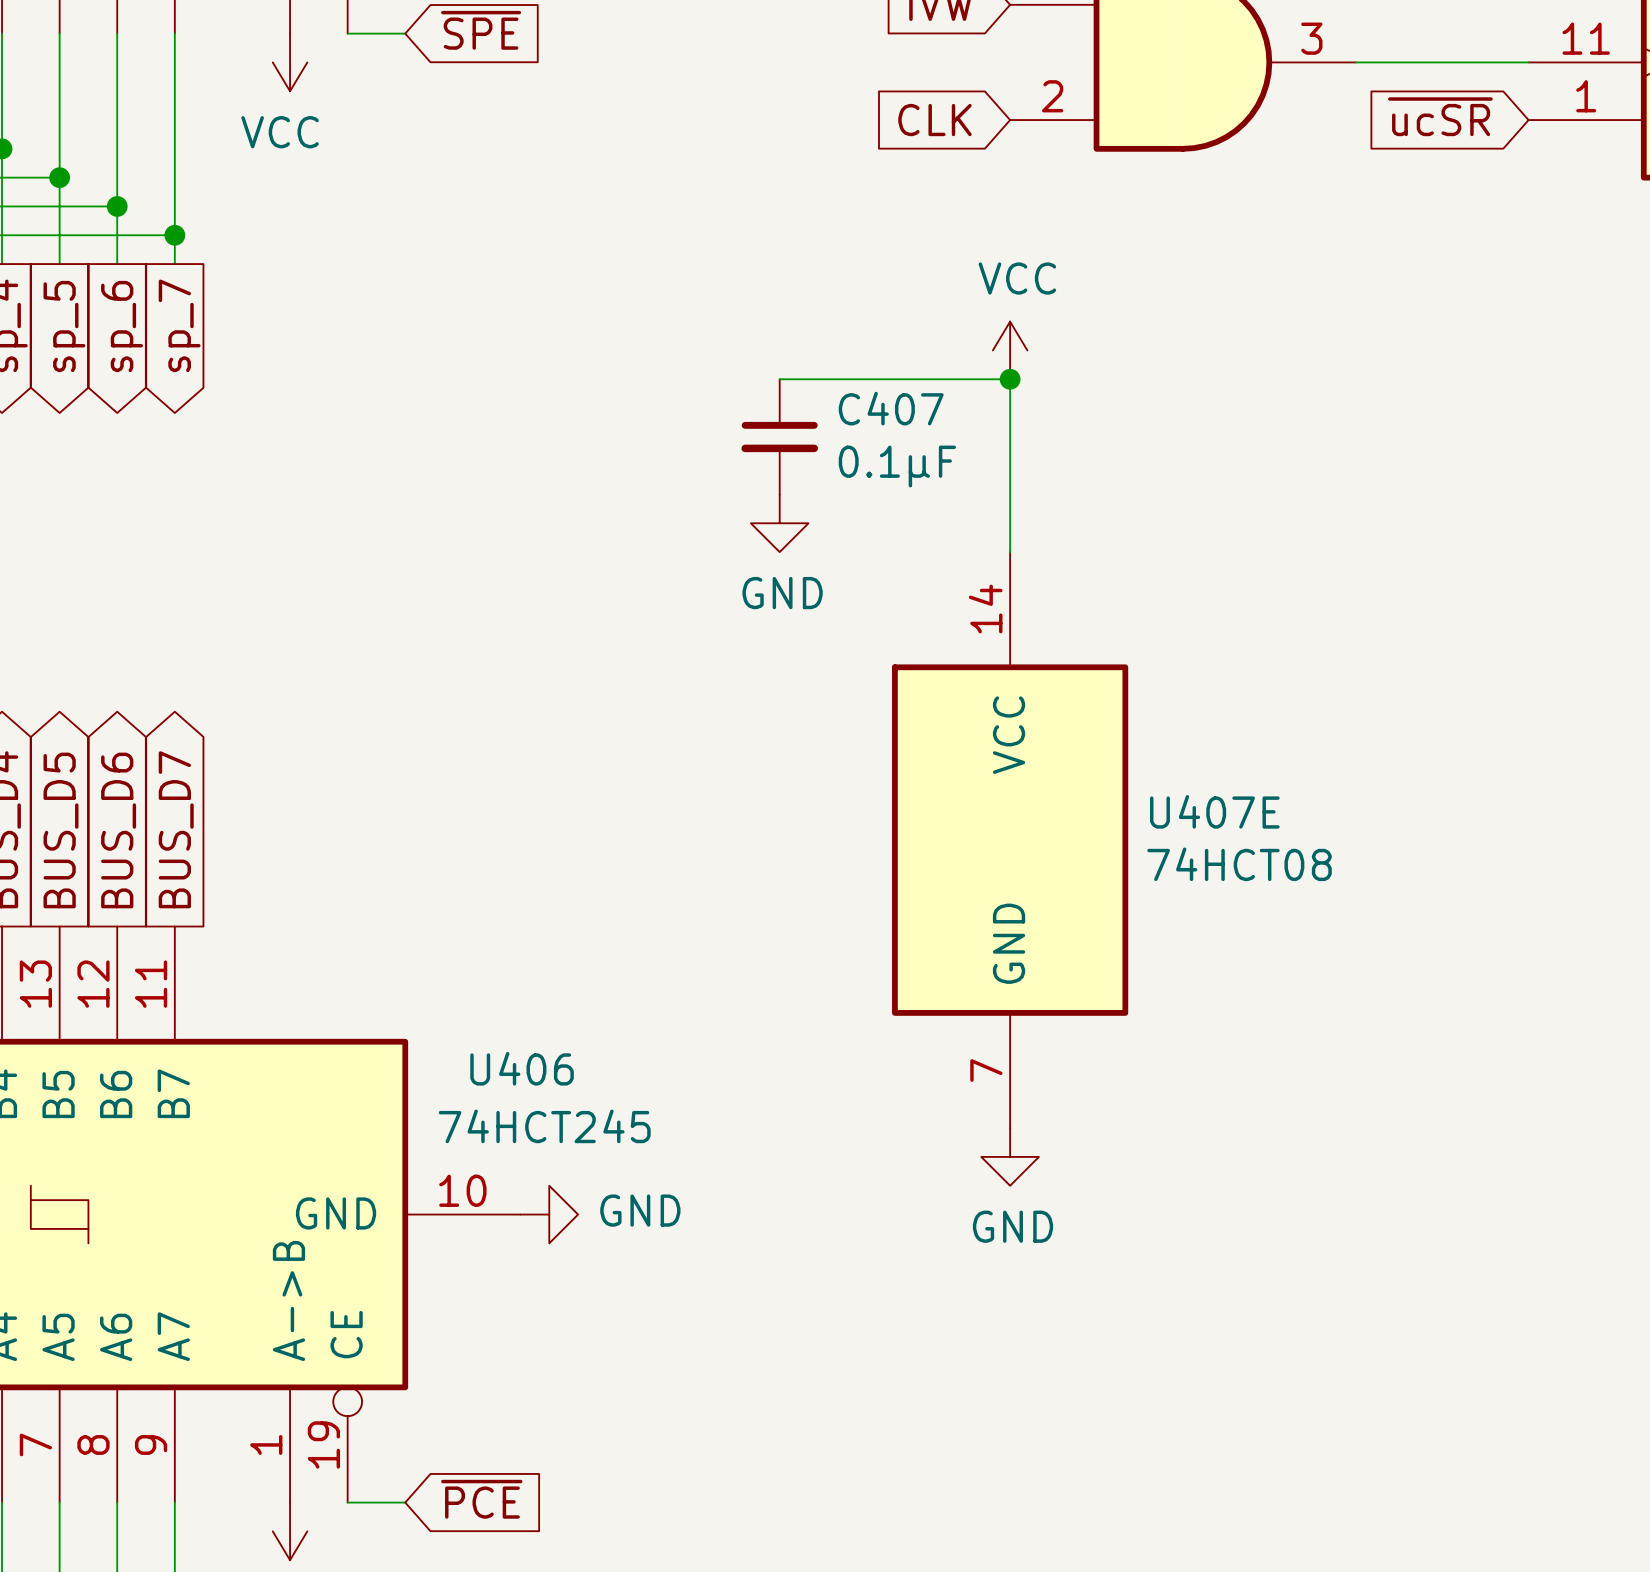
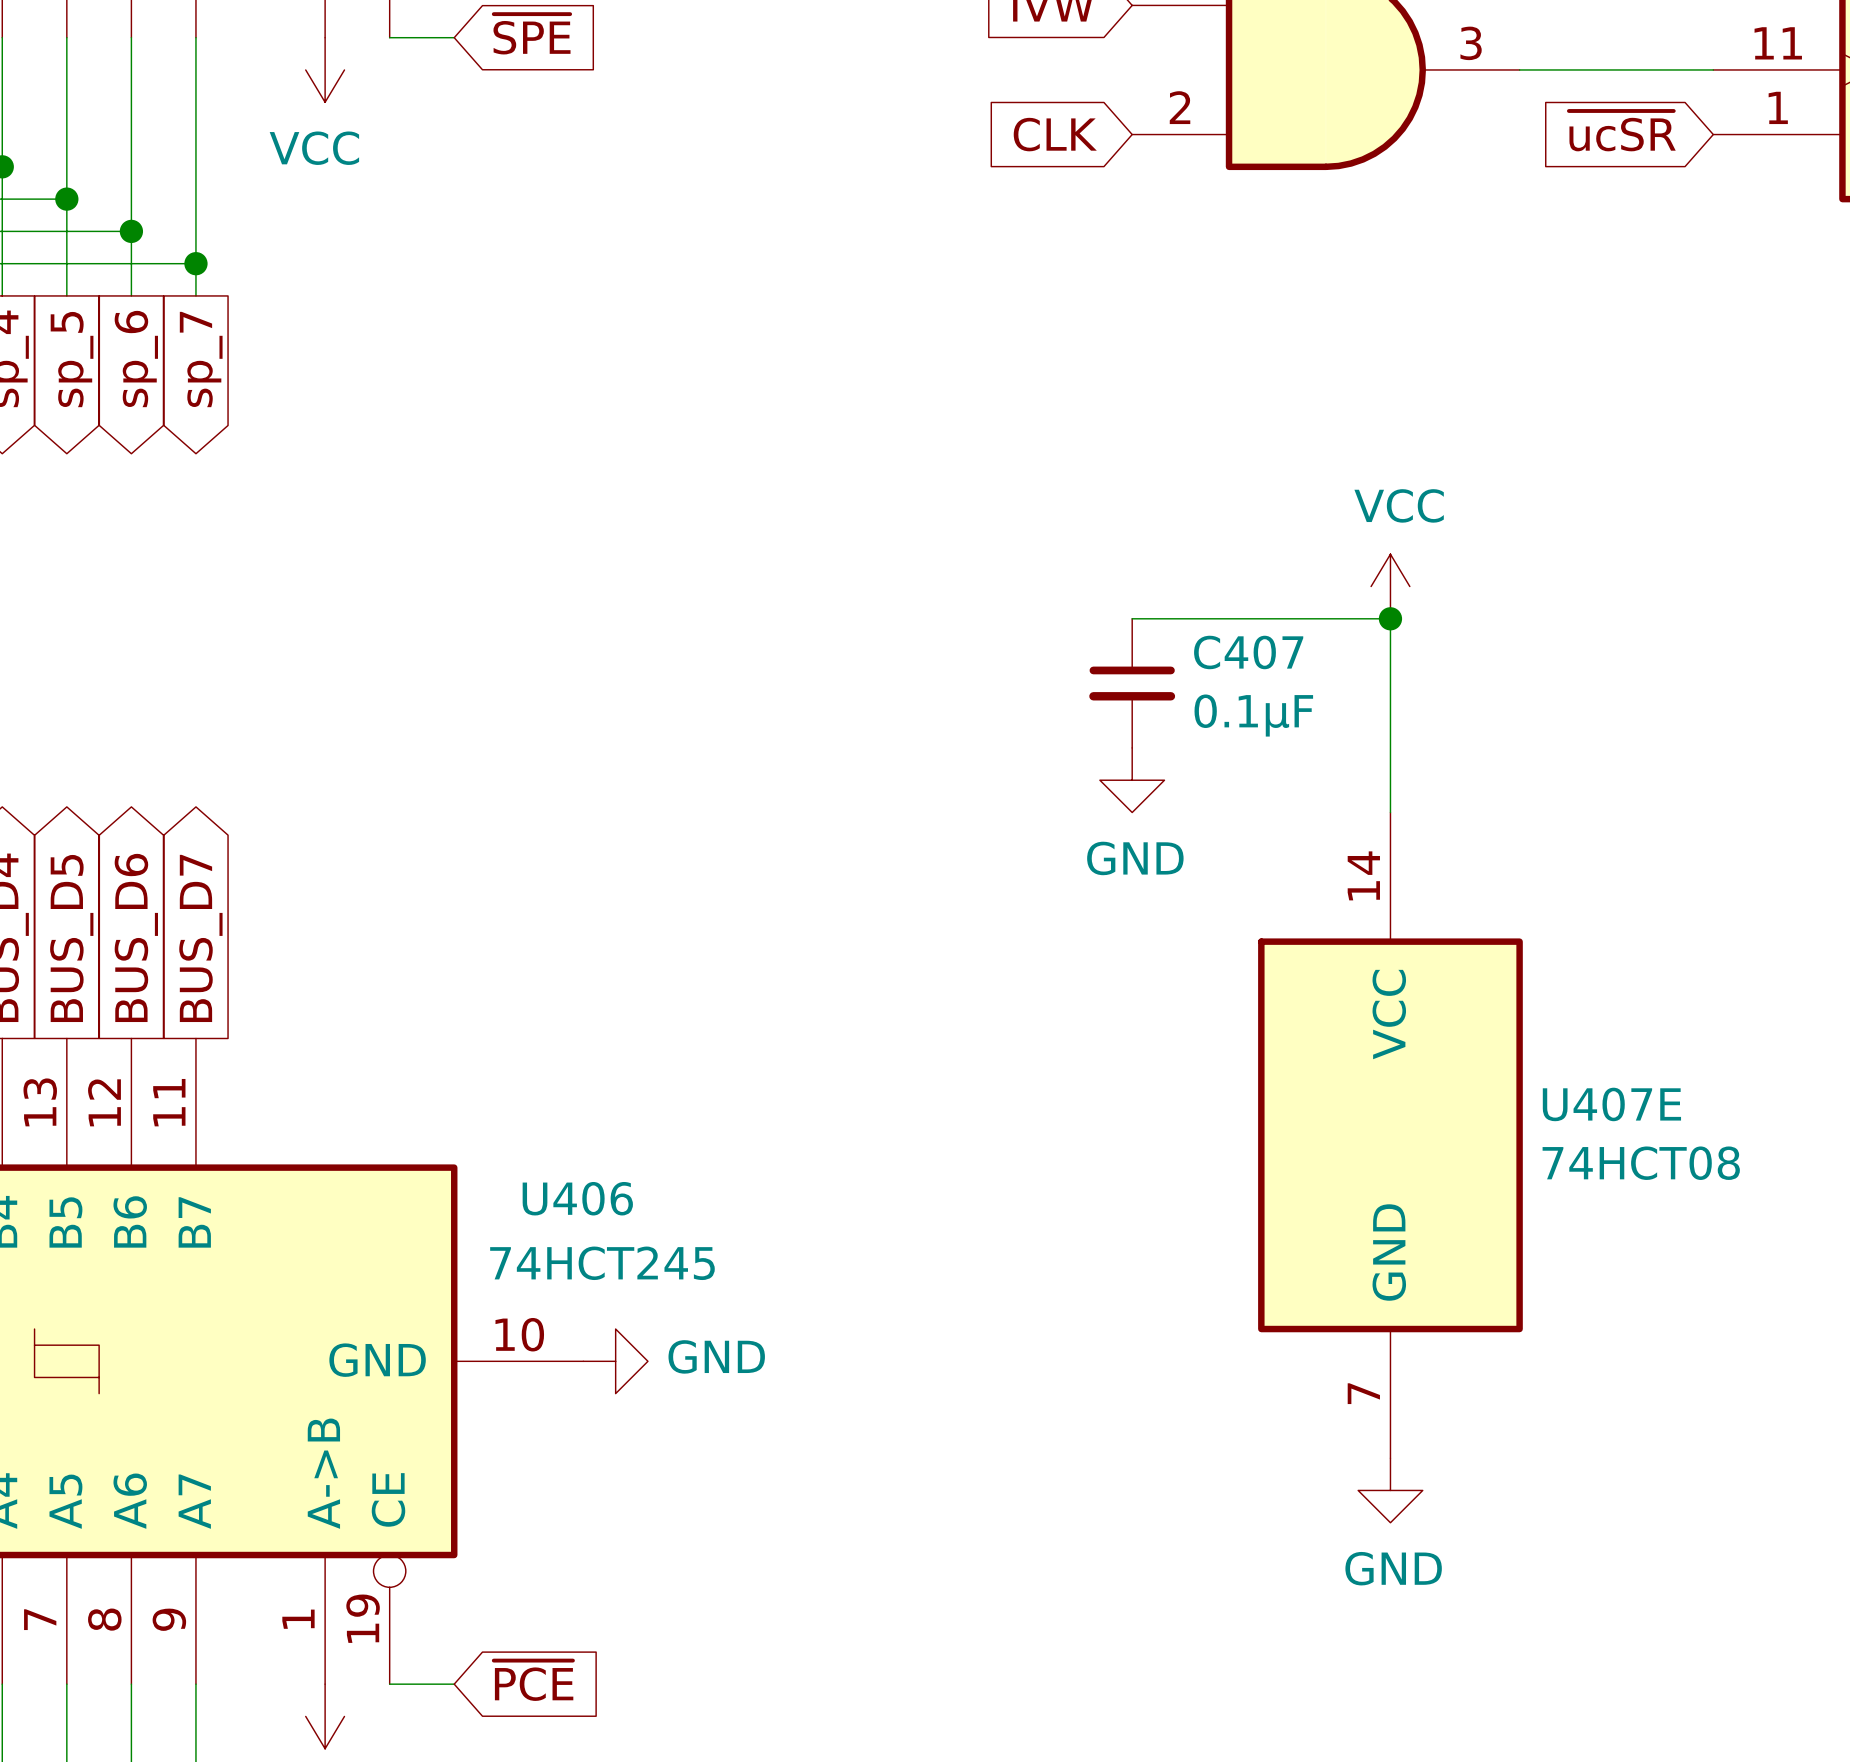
power symbol position: VCC (1010, 350) -> VCC (1390, 586)
wire: (779, 379) (1010, 379) (1010, 552) -> (1390, 812) (1390, 618) (1132, 618)
junction: (1010, 379) -> none
C407 position: (779, 436) -> (1132, 683)
power symbol: GND (779, 523) -> none
junction: none -> (1390, 618)
power symbol: none -> GND (1132, 780)
U407E position: (1010, 840) -> (1390, 1135)
power symbol: GND (1010, 1156) -> none
power symbol: none -> GND (1390, 1490)

